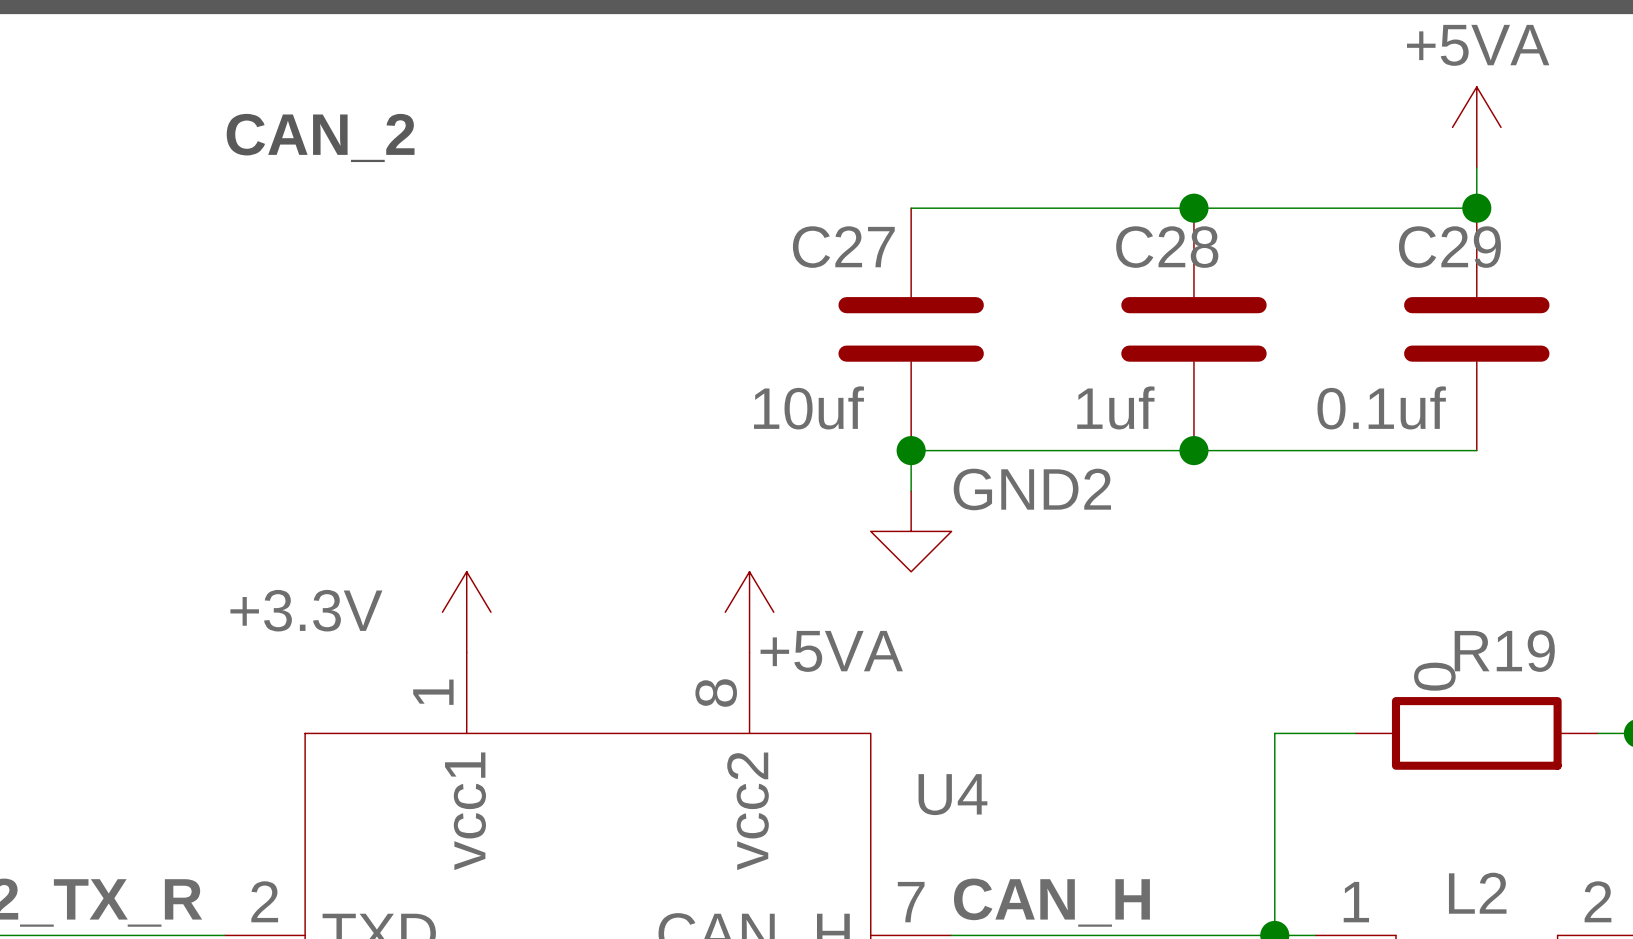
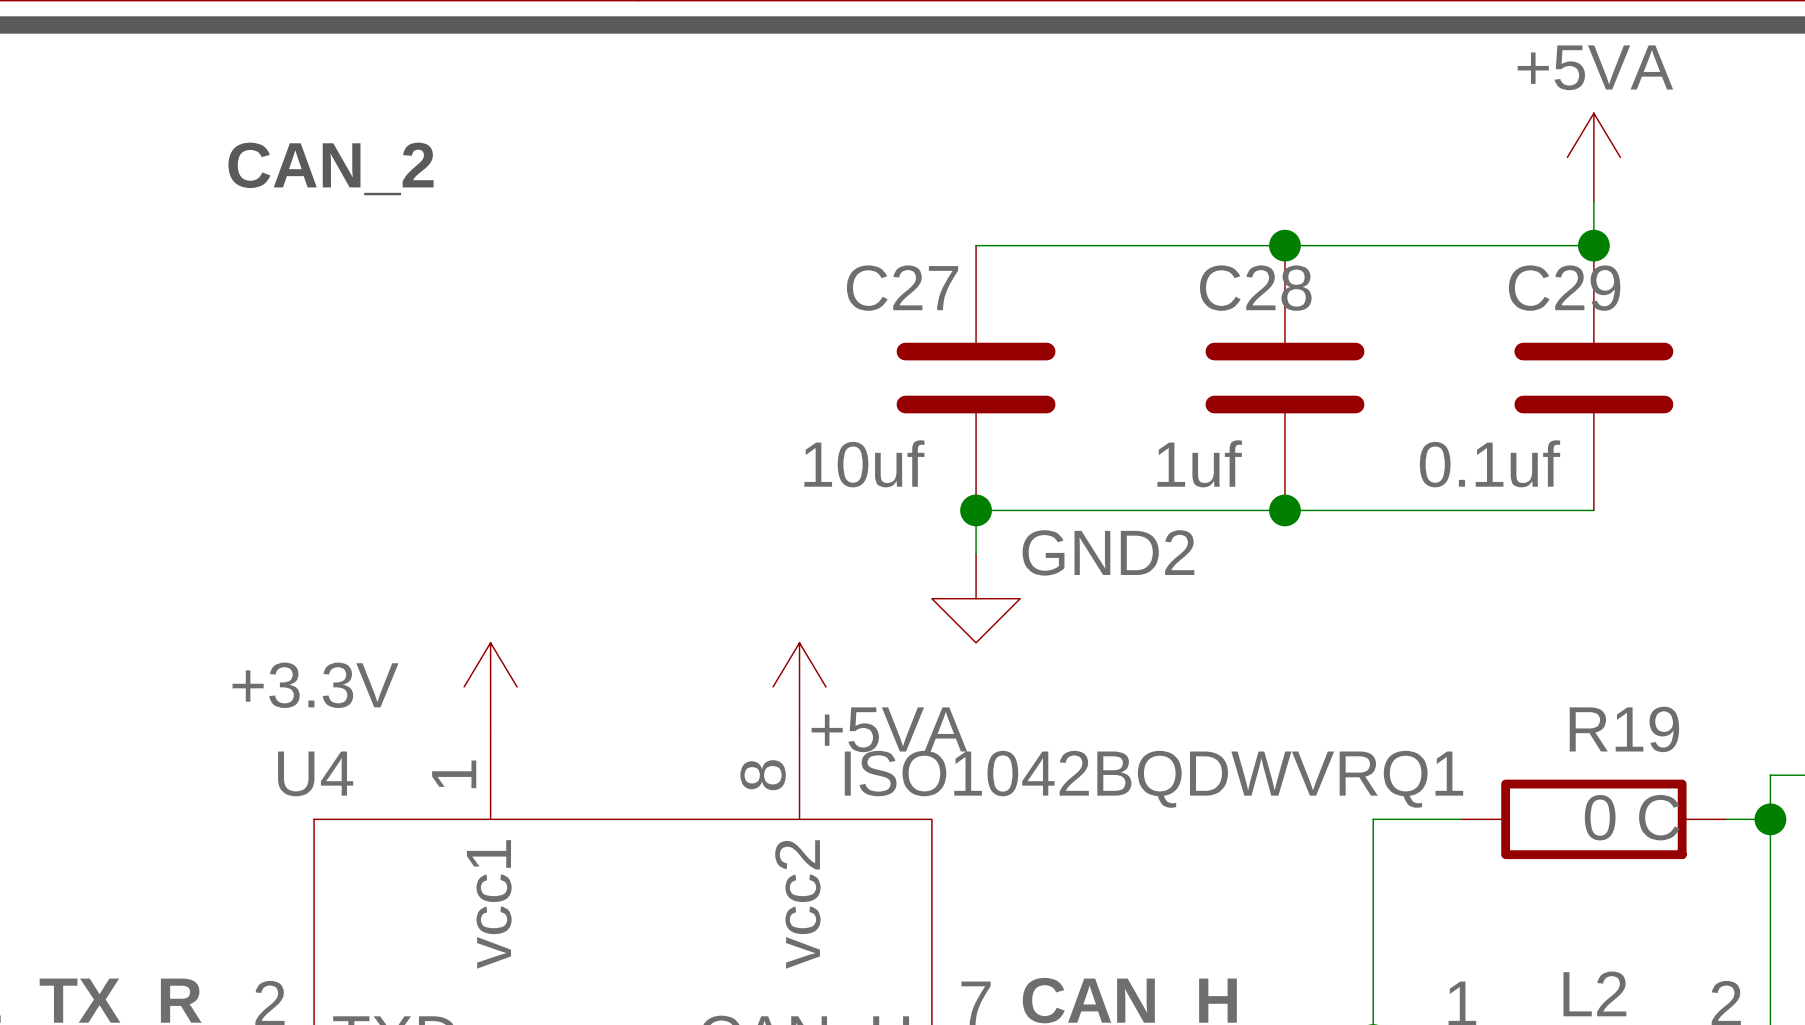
R19 value: 0 (1434, 676) -> 0 C (1632, 817)
U4 value: none -> ISO1042BQDWVRQ1 (1153, 779)
U4 name position: U4 (952, 794) -> U4 (315, 773)

